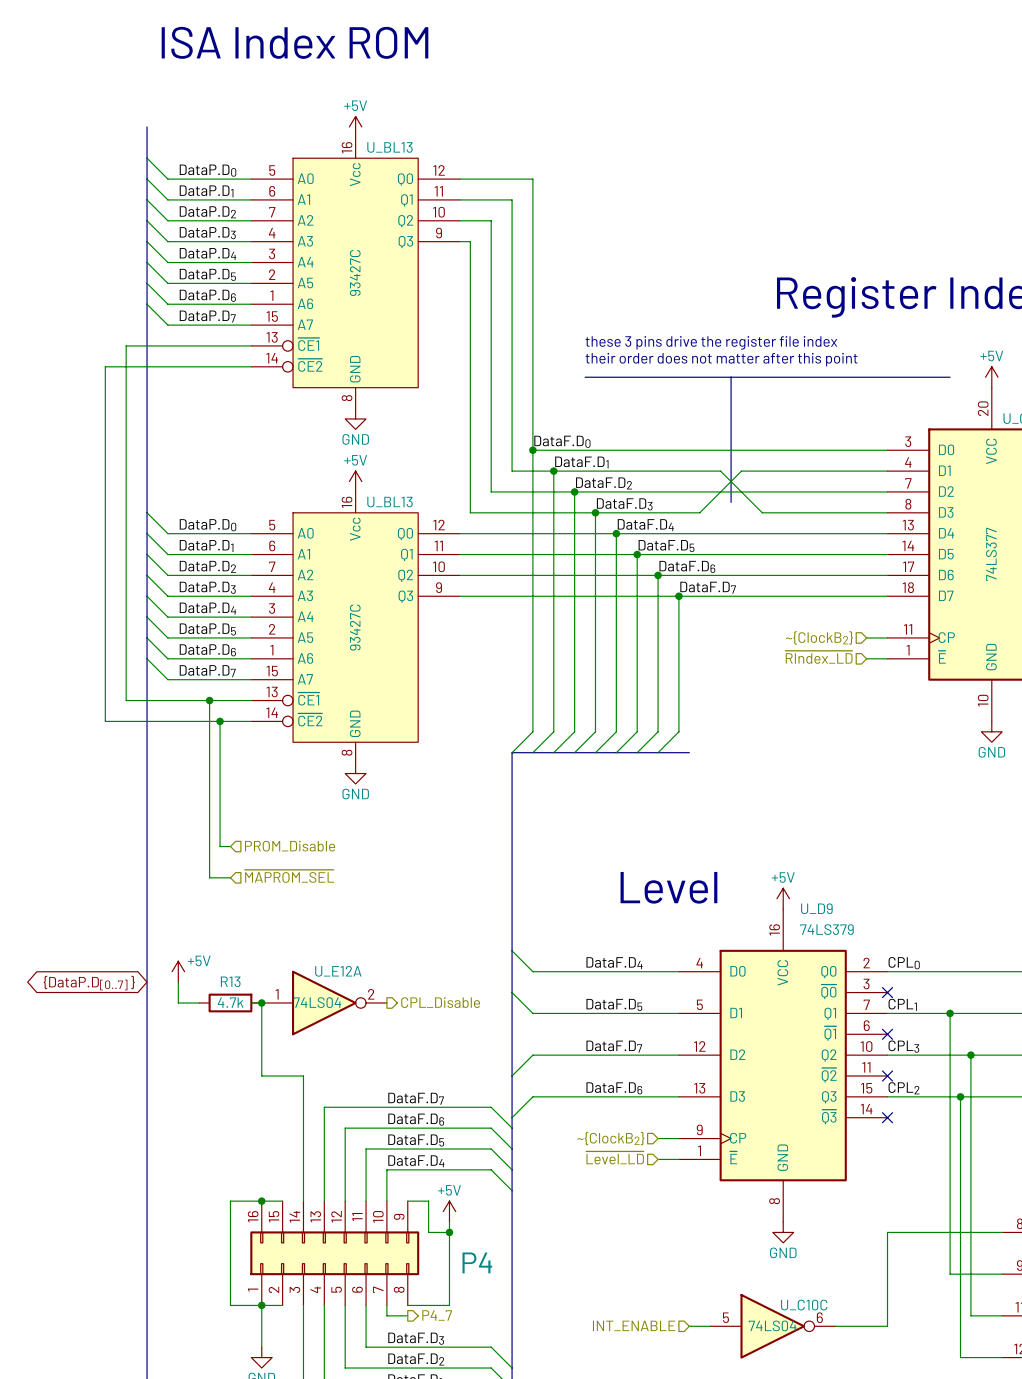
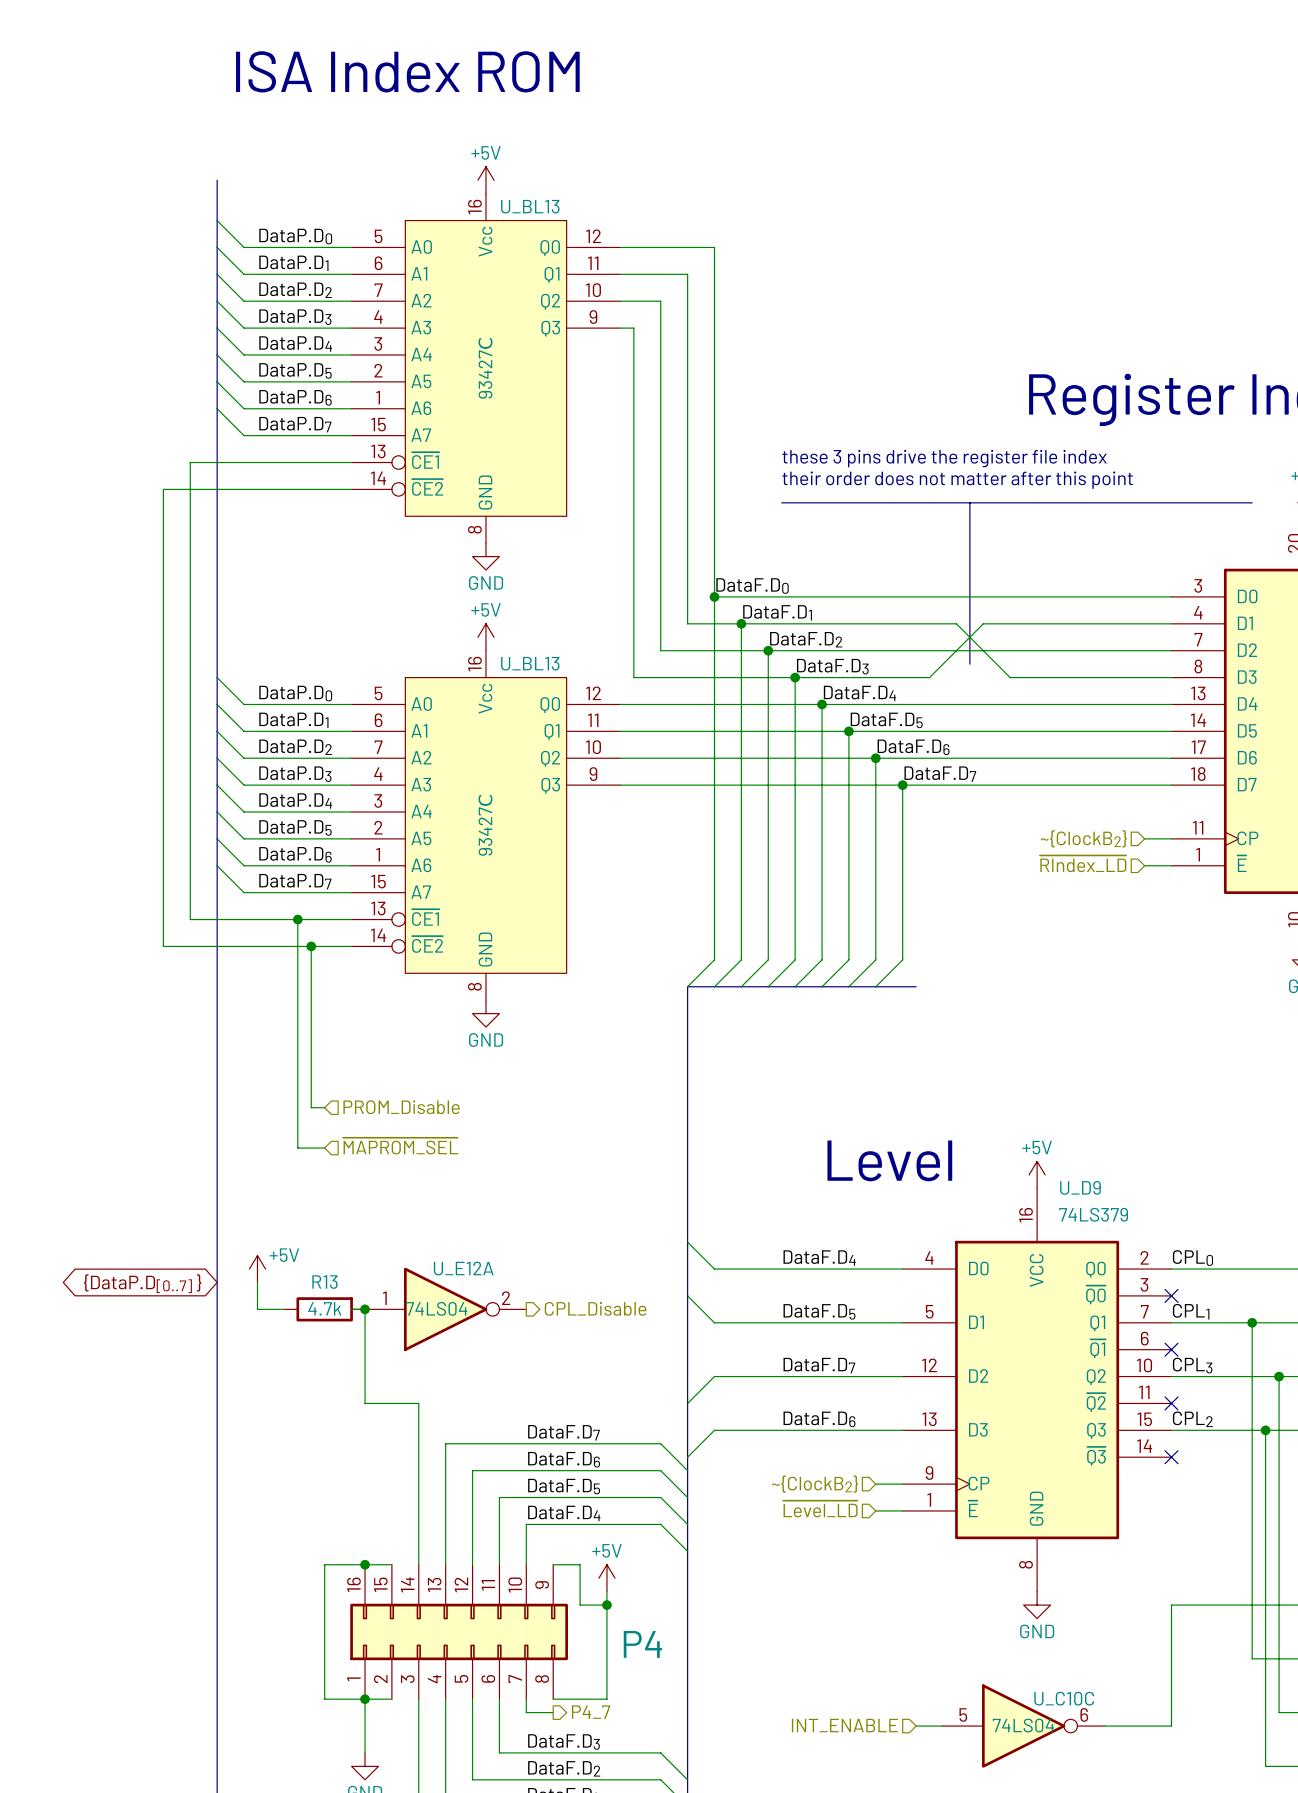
U_BL13 value: 93427C (355, 273) -> 93427С (485, 368)
U_BL13 value: 93427C (355, 627) -> 93427С (485, 825)

